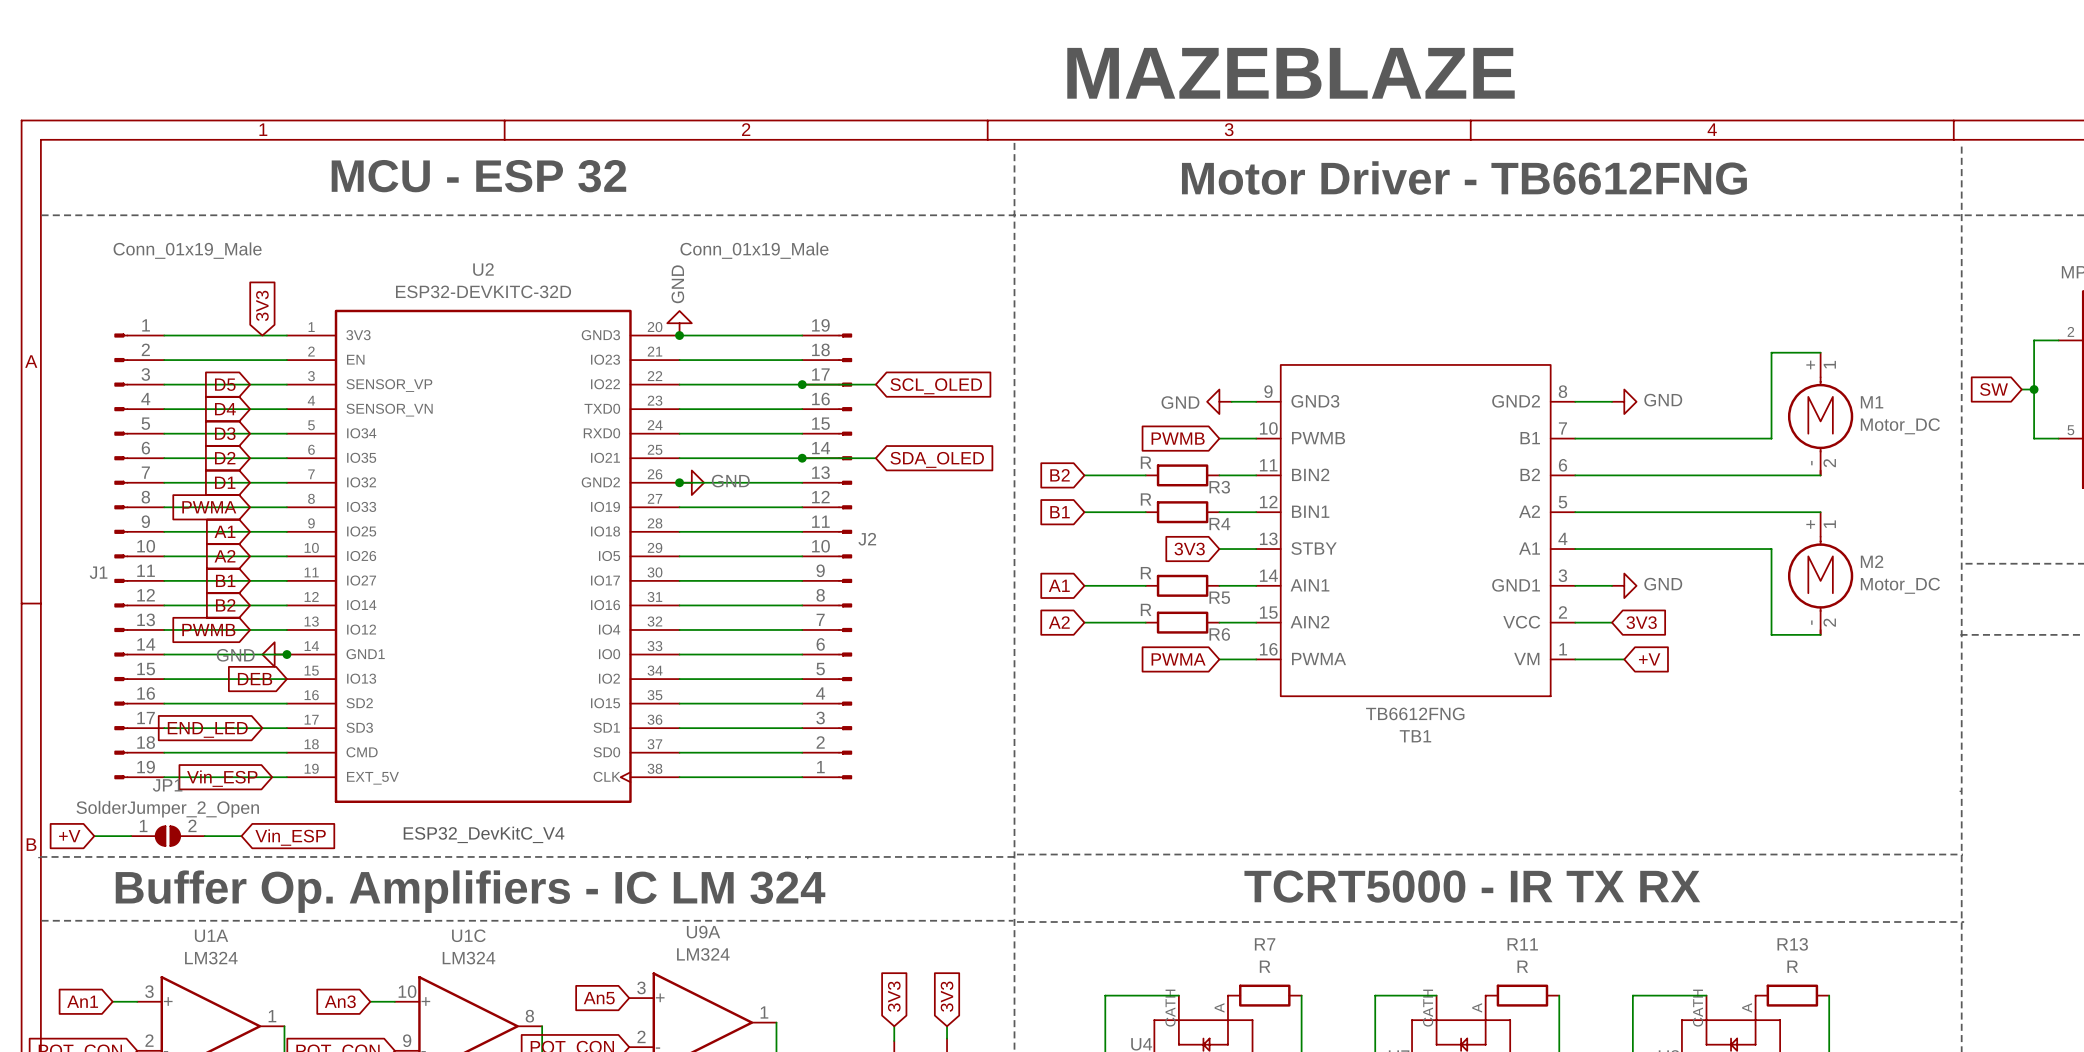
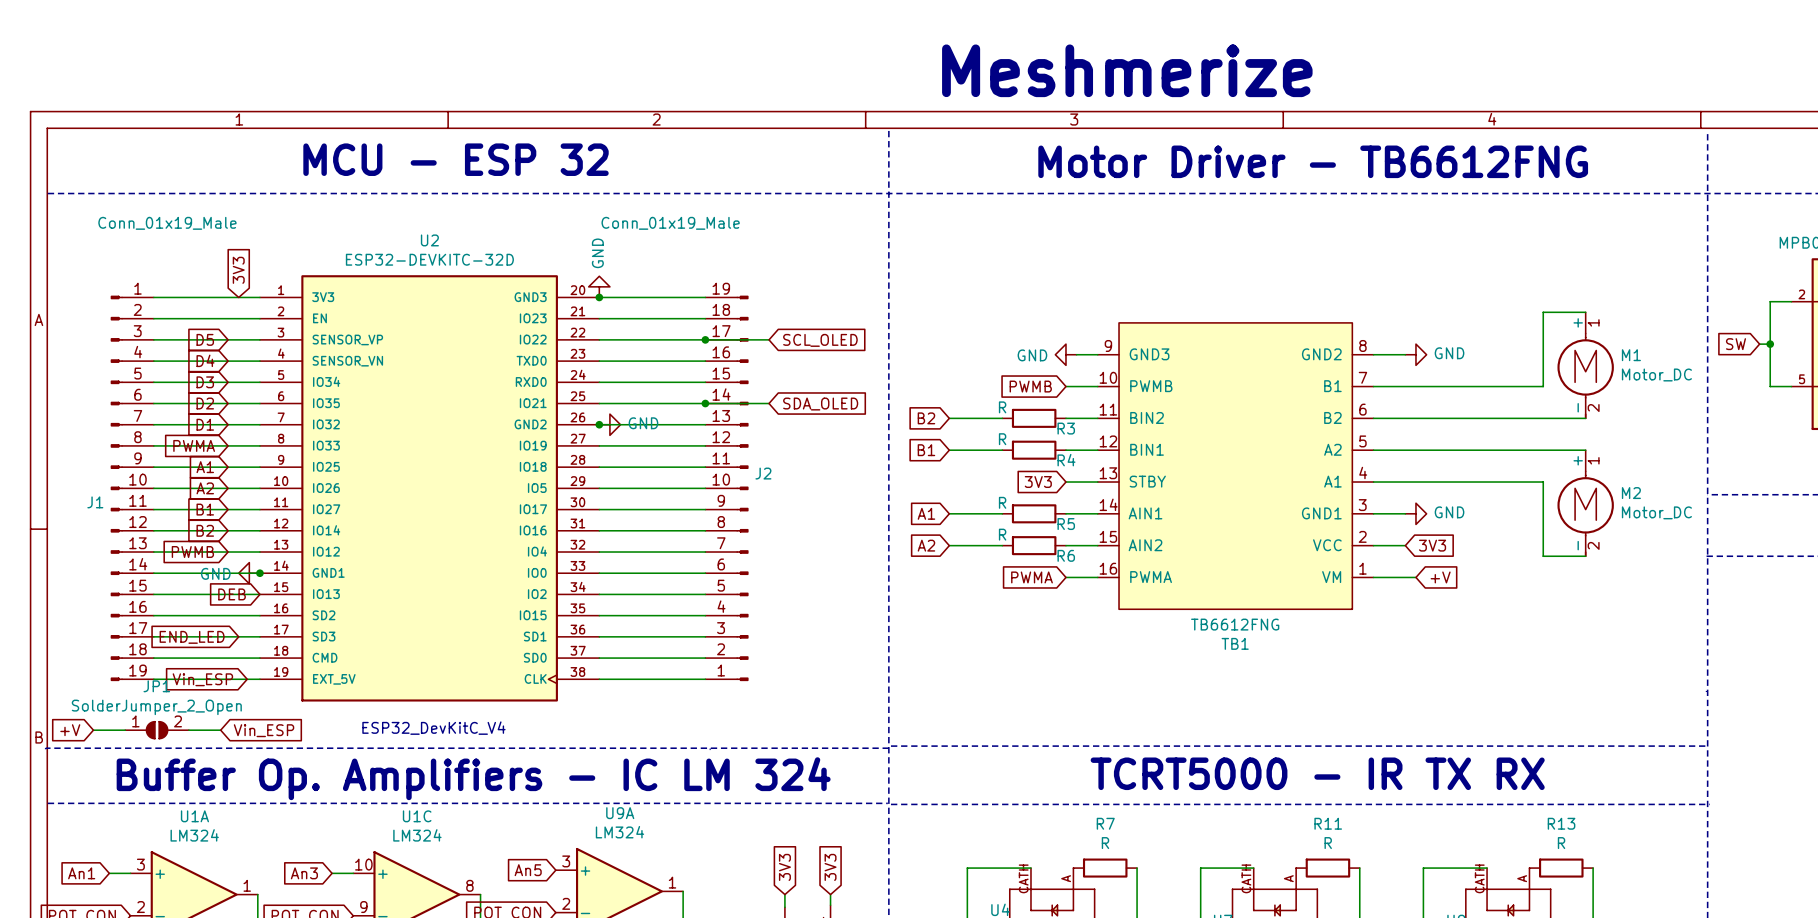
text: MAZEBLAZE (1291, 73) -> Meshmerize (1127, 70)

